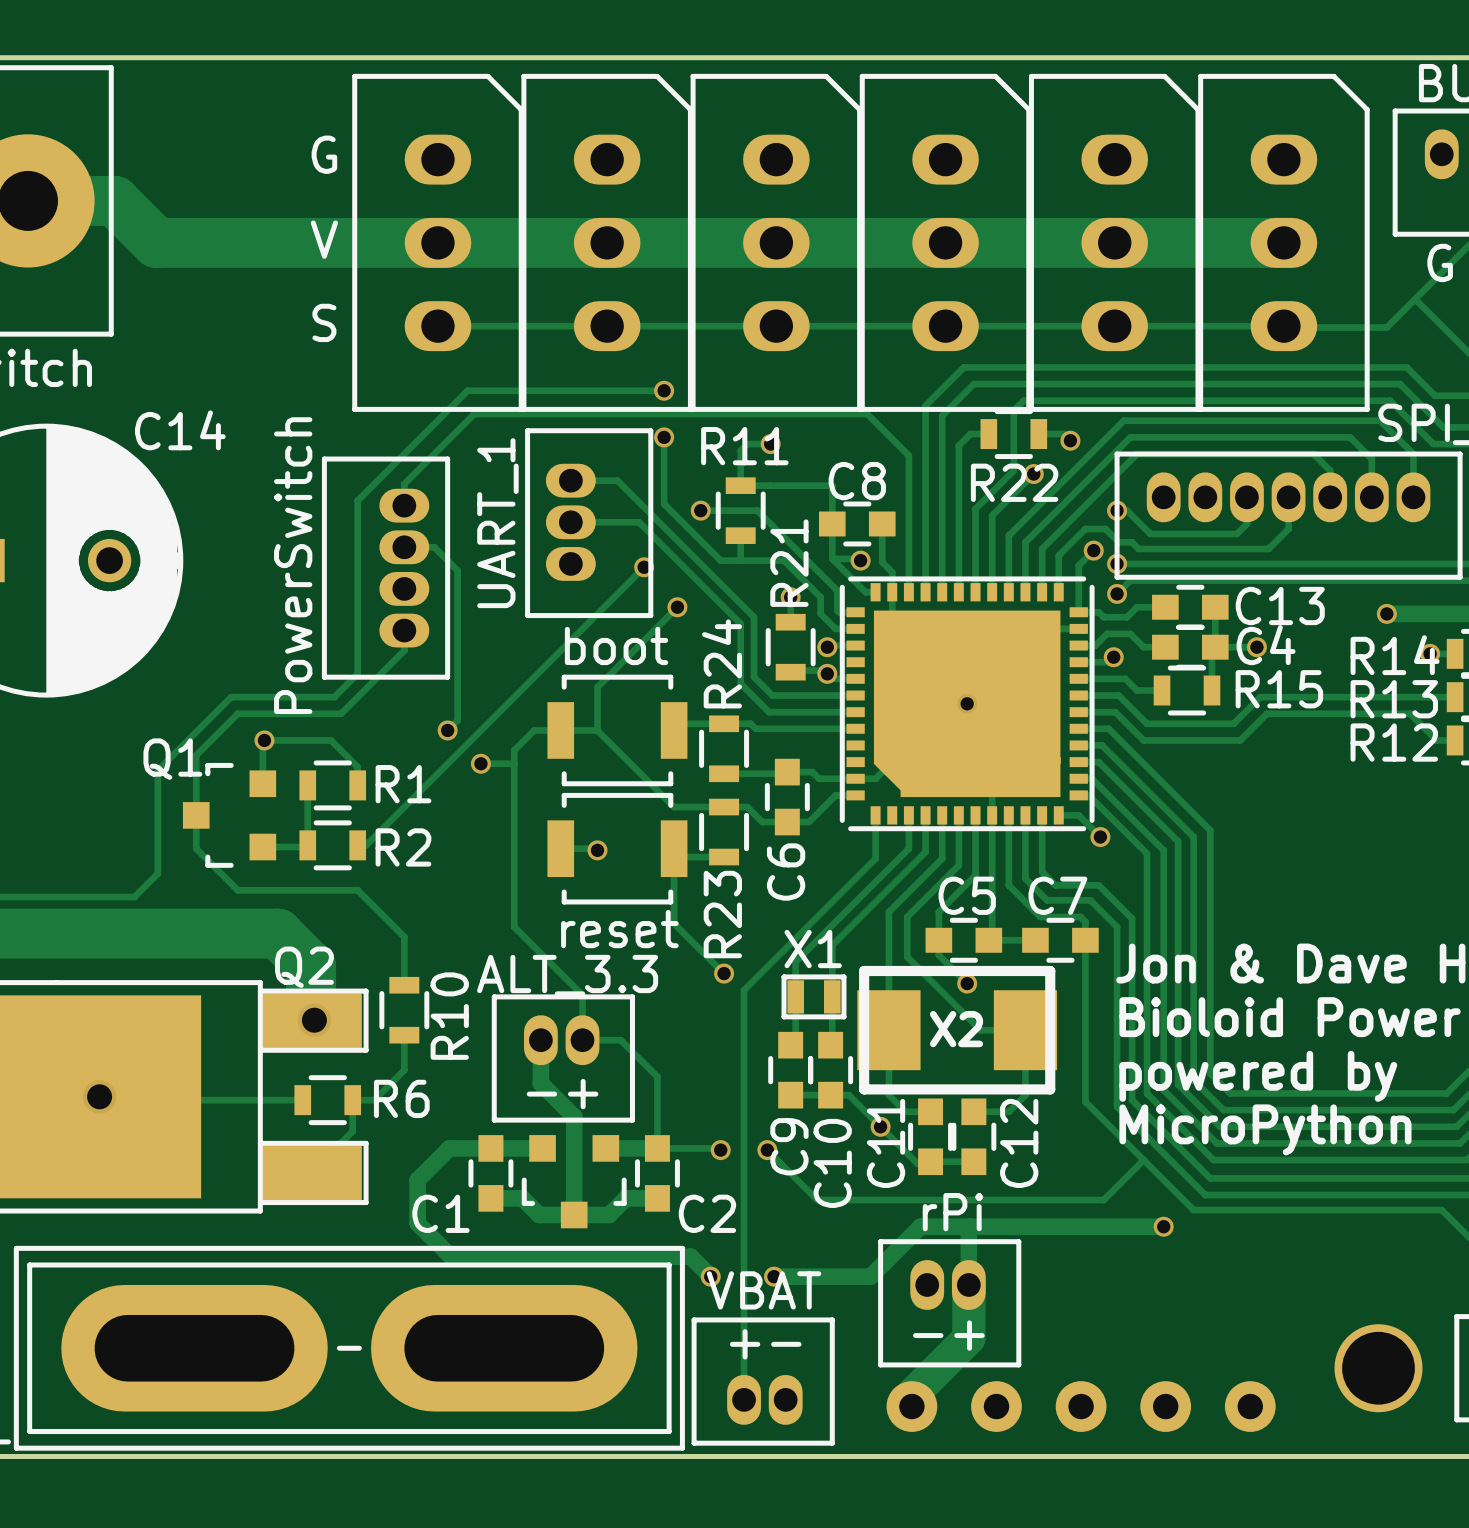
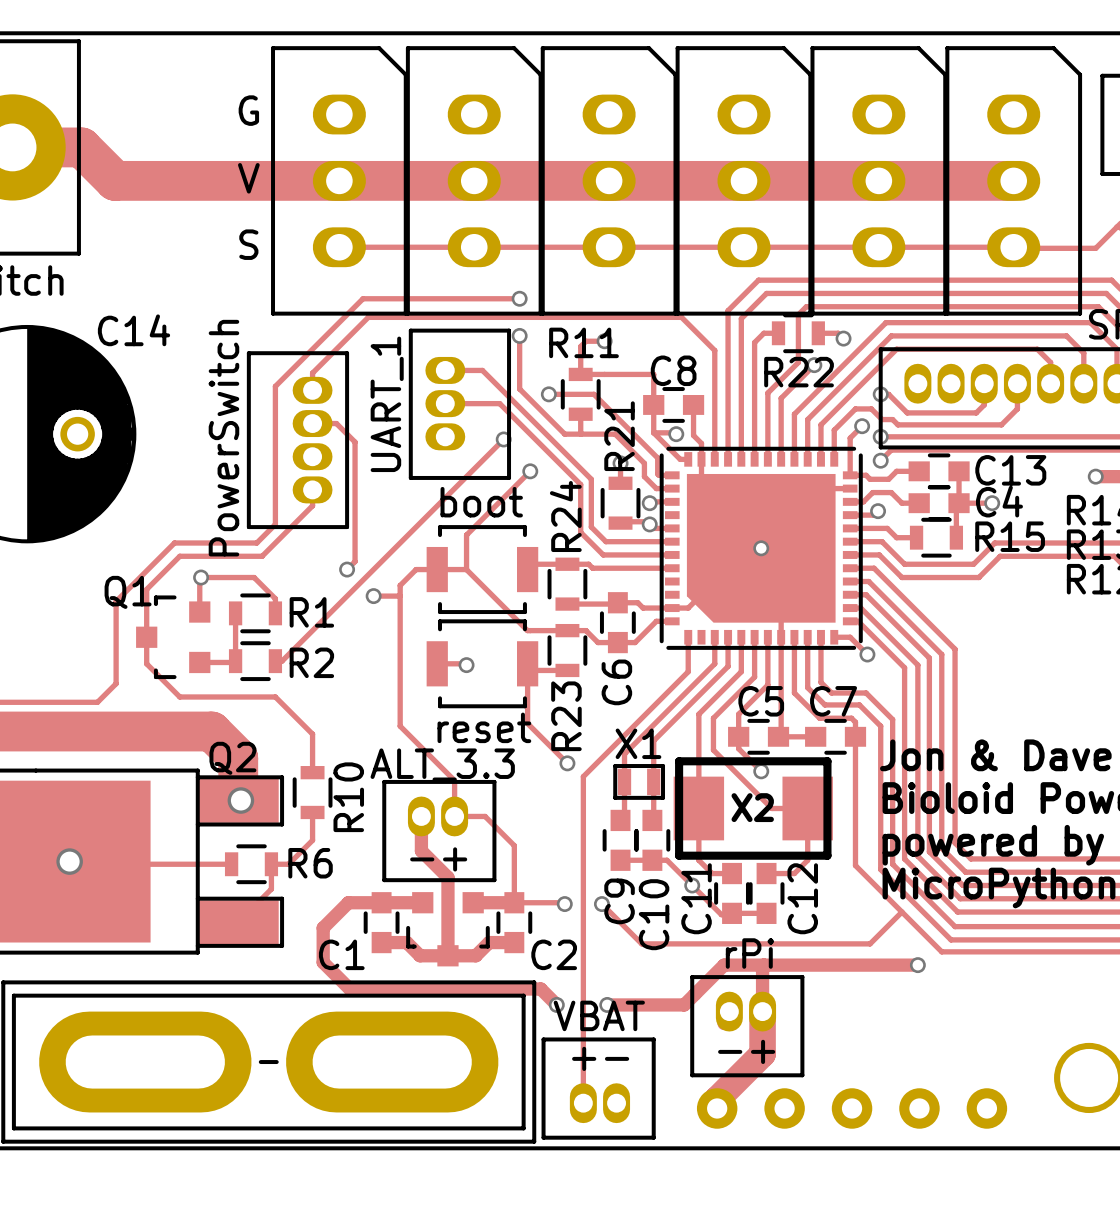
part footprint: [839, 576, 1095, 832] -> [659, 446, 863, 650]

